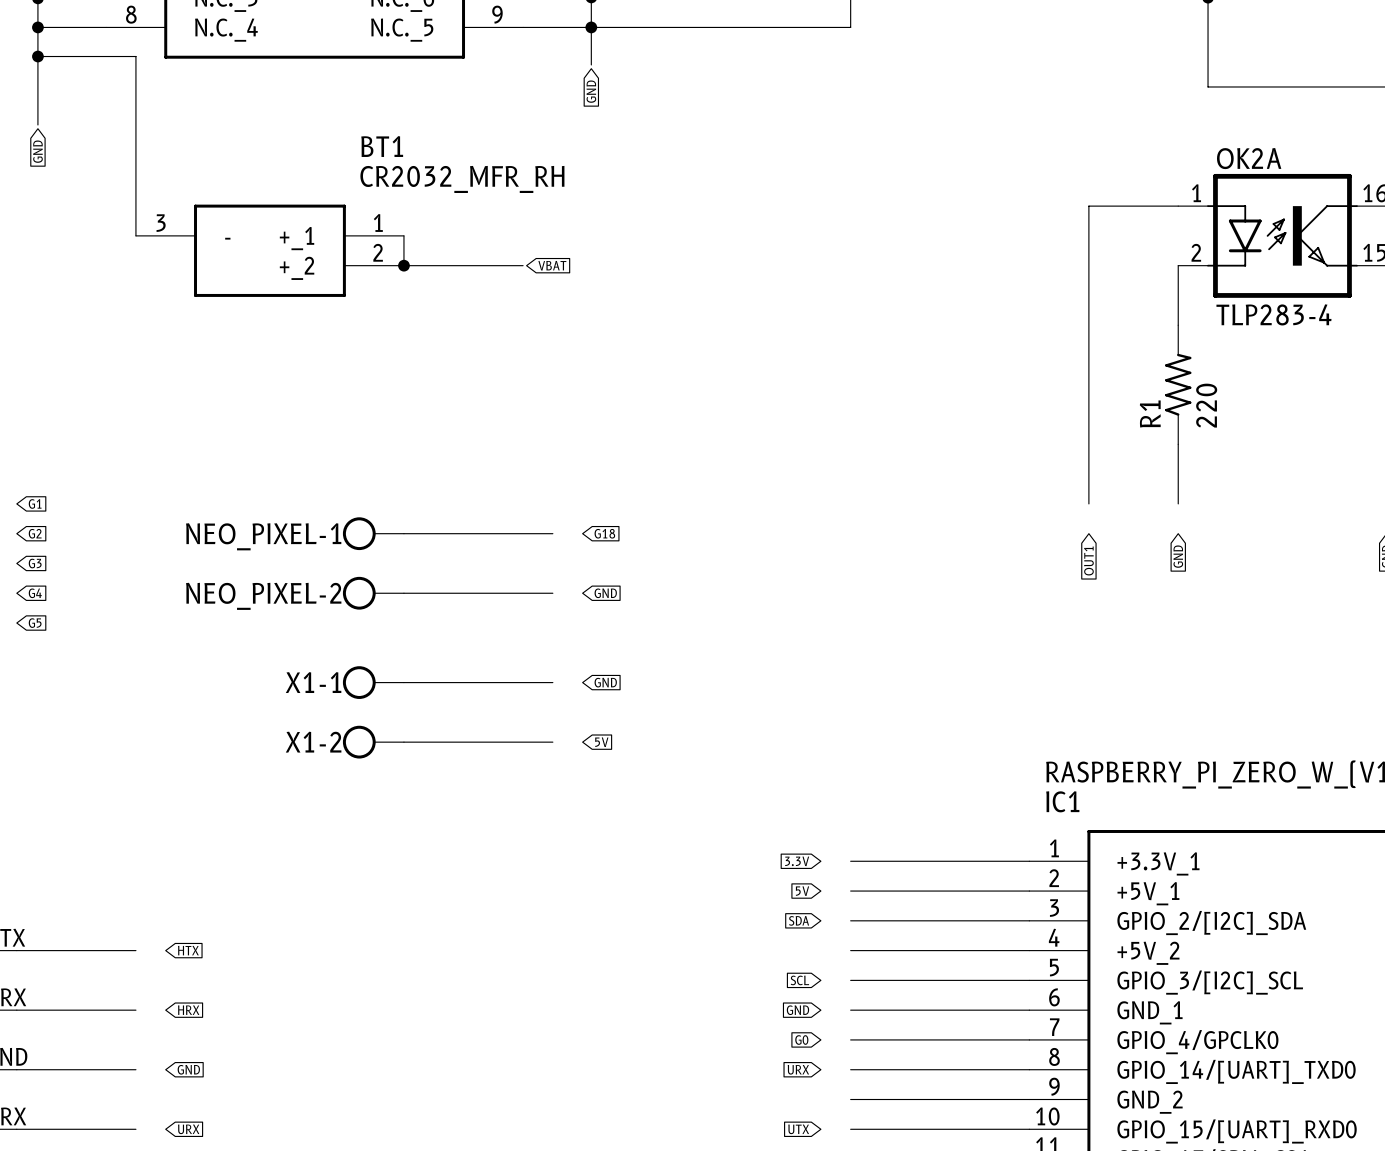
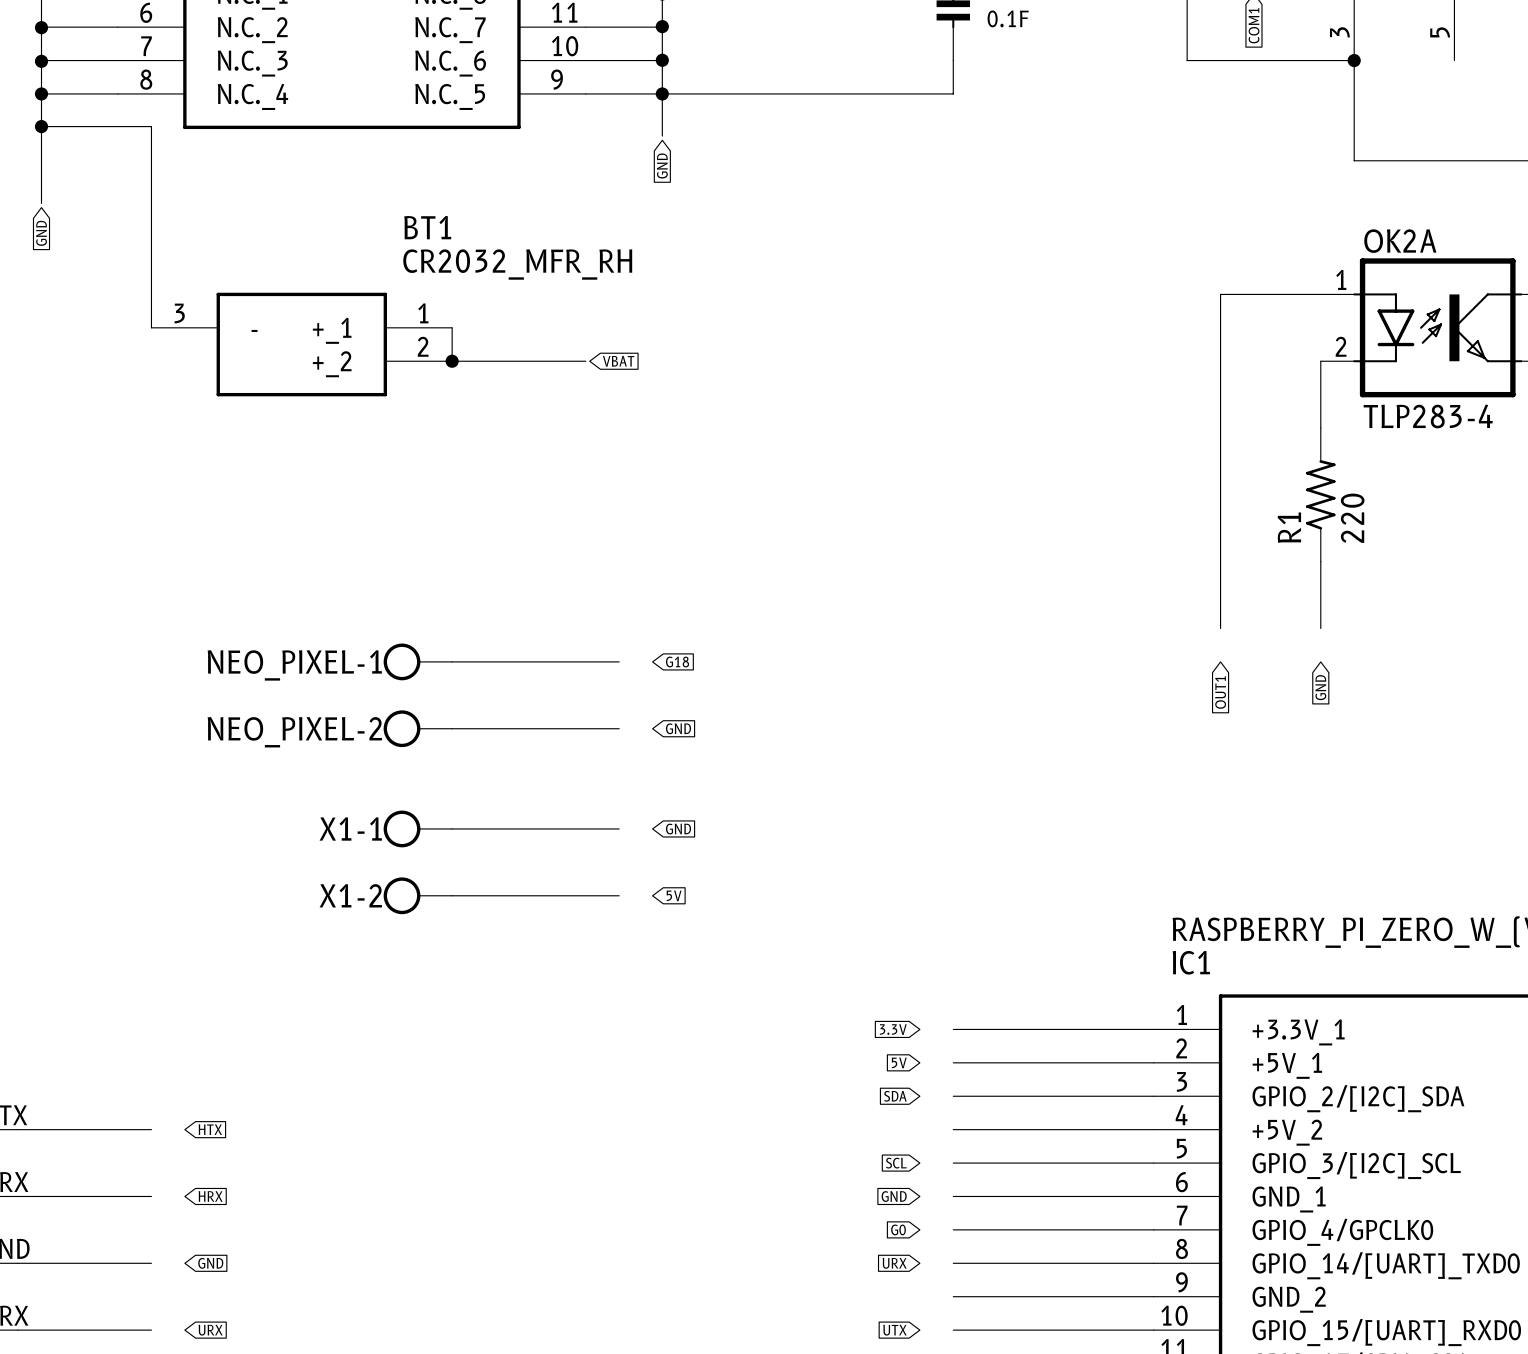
global label: G1 (35, 503) -> none
global label: G2 (35, 533) -> none
global label: G3 (35, 563) -> none
global label: G4 (35, 593) -> none
global label: G5 (35, 623) -> none

